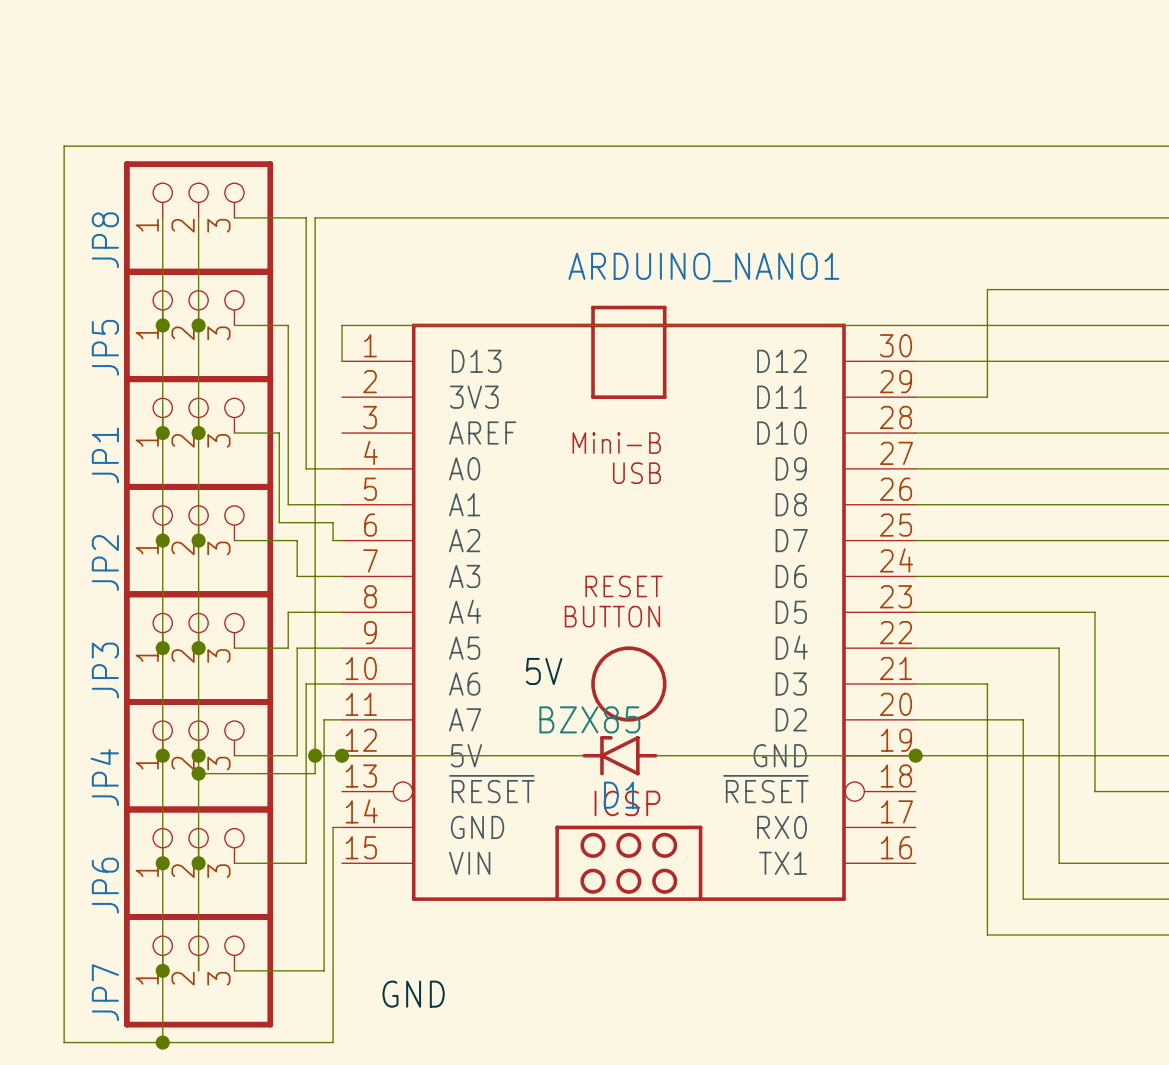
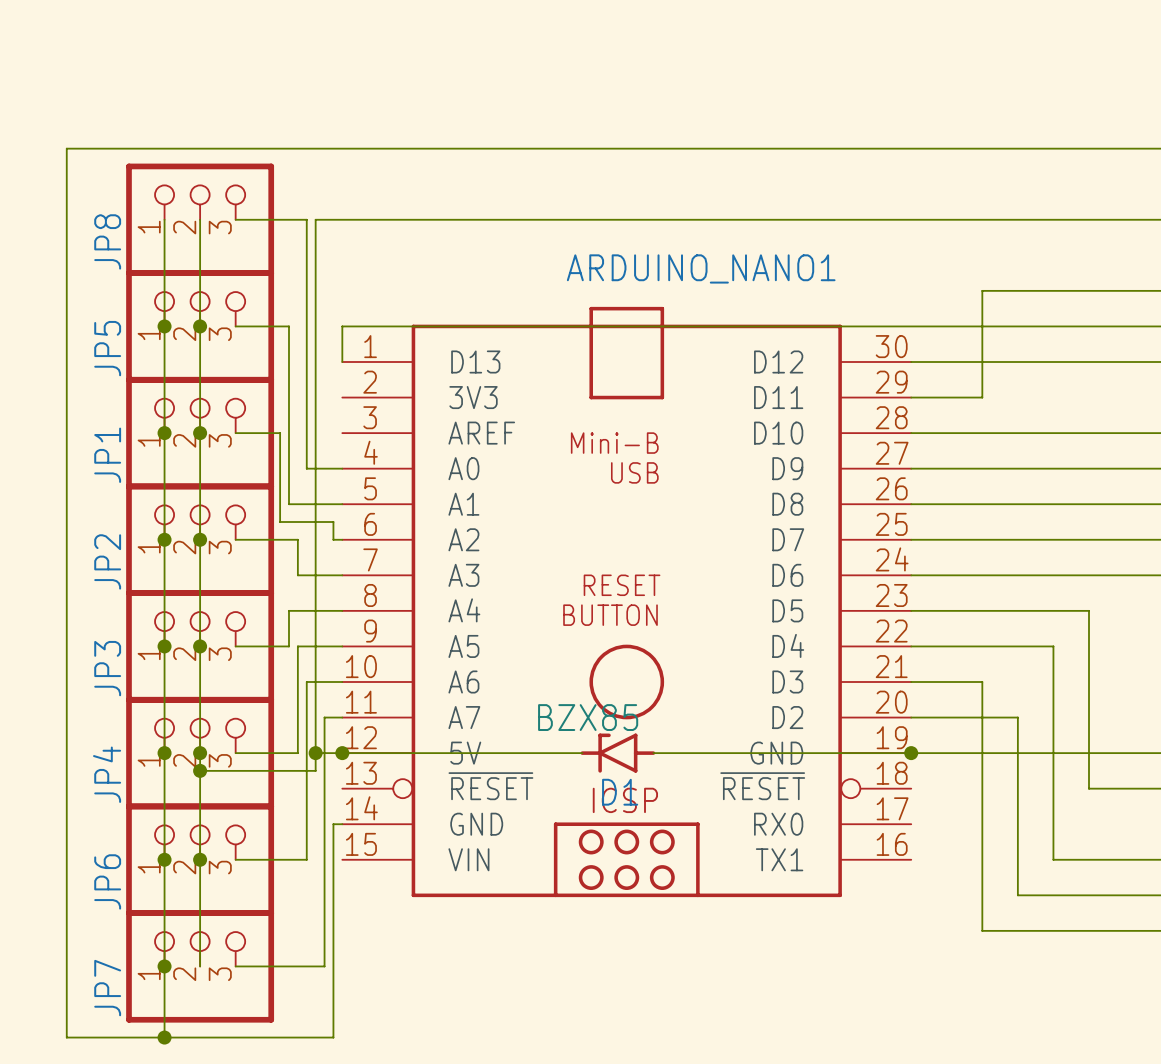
label: 5V (544, 671) -> none
label: GND (413, 994) -> none

